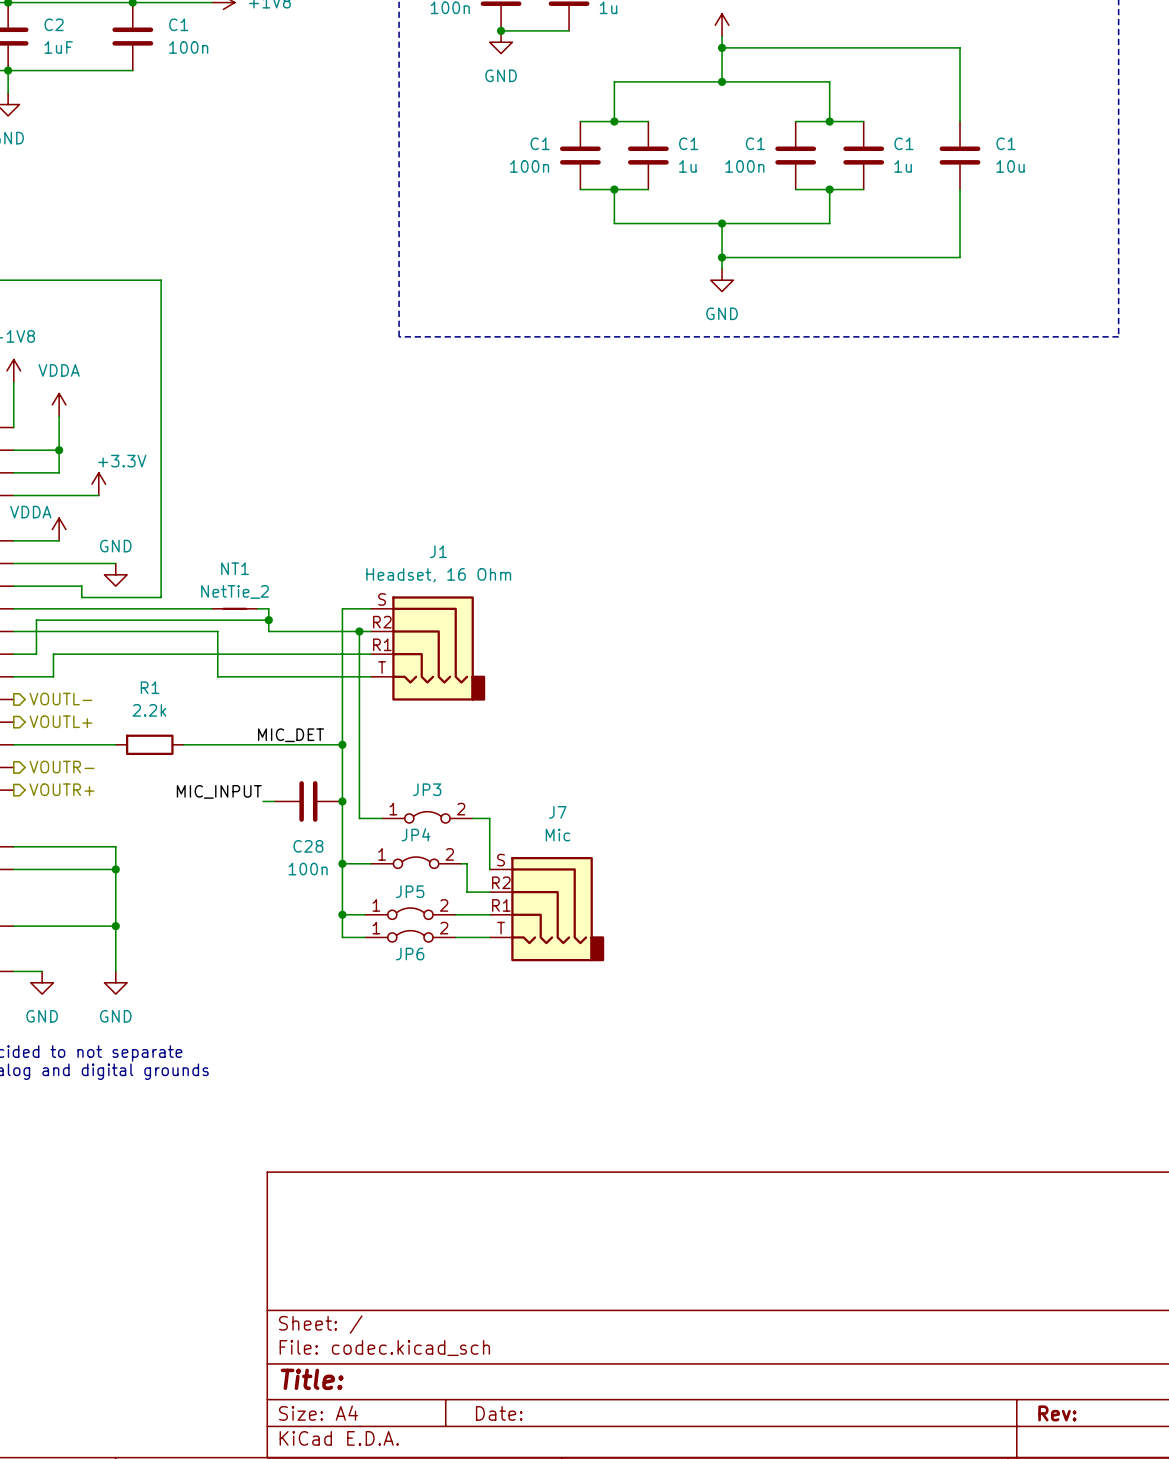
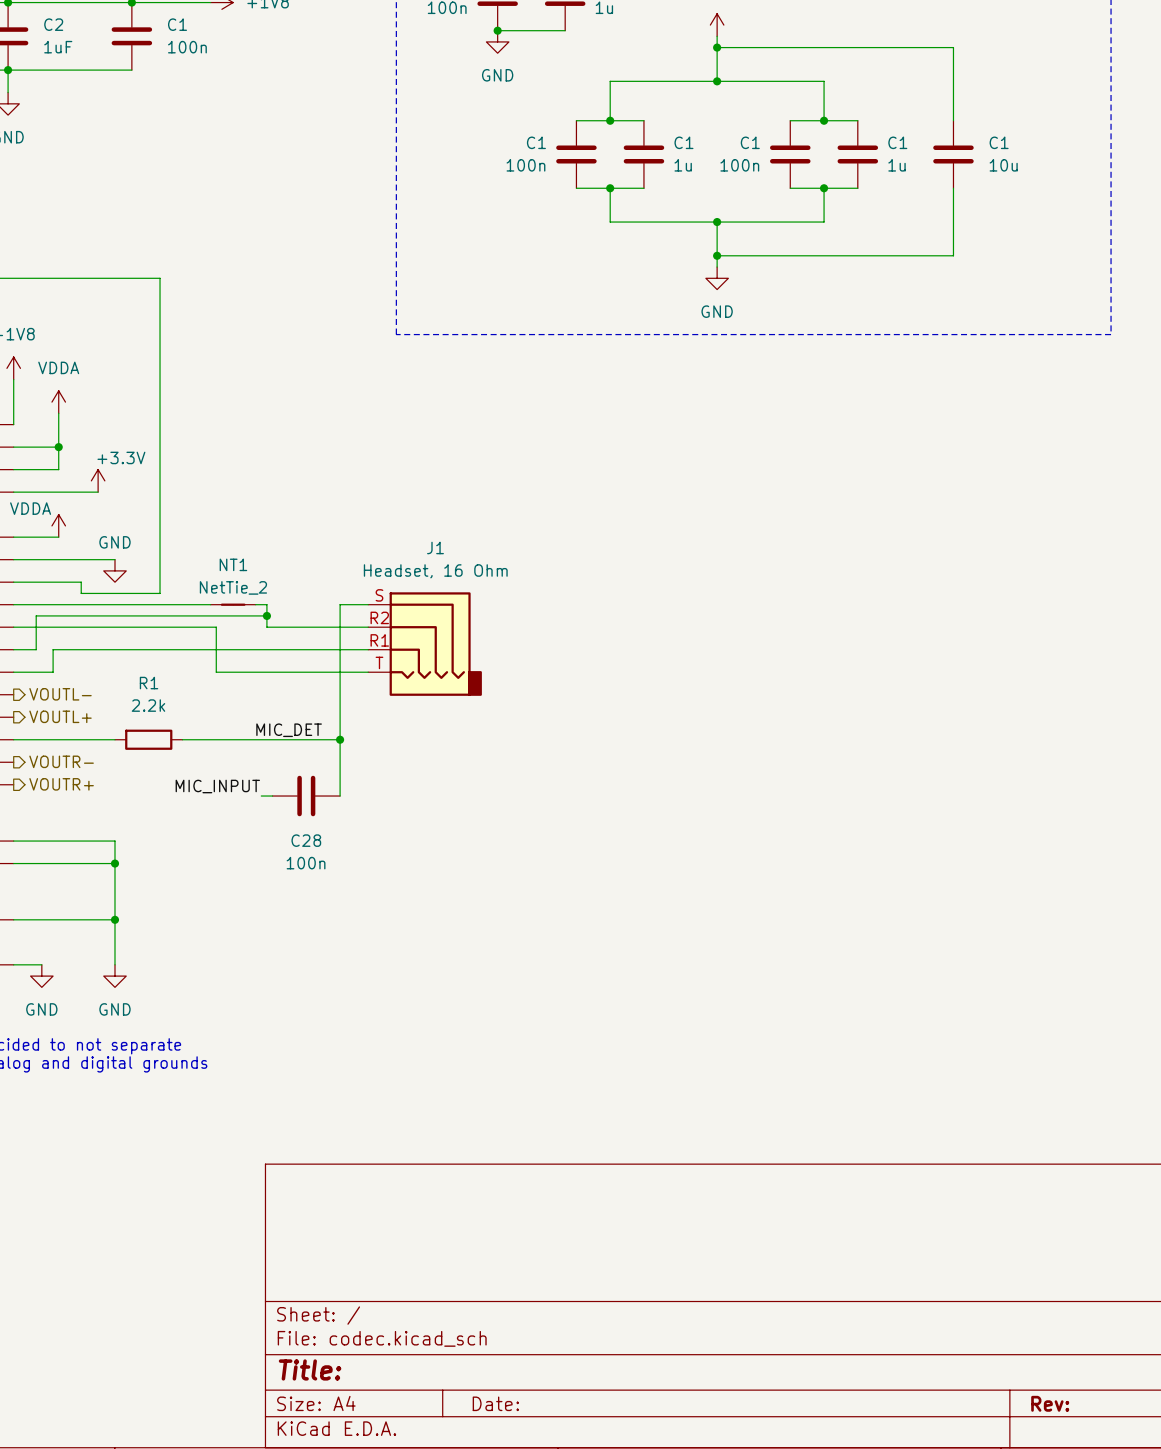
wire: (359, 631) (359, 818) (382, 818) -> none
junction: (359, 631) -> none
wire: (342, 801) (342, 937) (365, 937) -> none
junction: (342, 801) -> none
JP3: (427, 817) -> none
wire: (472, 818) (489, 818) (489, 869) -> none
JP4: (416, 862) -> none
wire: (342, 863) (370, 863) -> none
junction: (342, 863) -> none
wire: (461, 863) (467, 863) (467, 892) (489, 892) -> none
J7: Mic (546, 909) -> none
JP5: (410, 913) -> none
wire: (342, 914) (365, 914) -> none
junction: (342, 914) -> none
wire: (455, 914) (489, 914) -> none
JP6: (410, 936) -> none
wire: (455, 937) (489, 937) -> none

